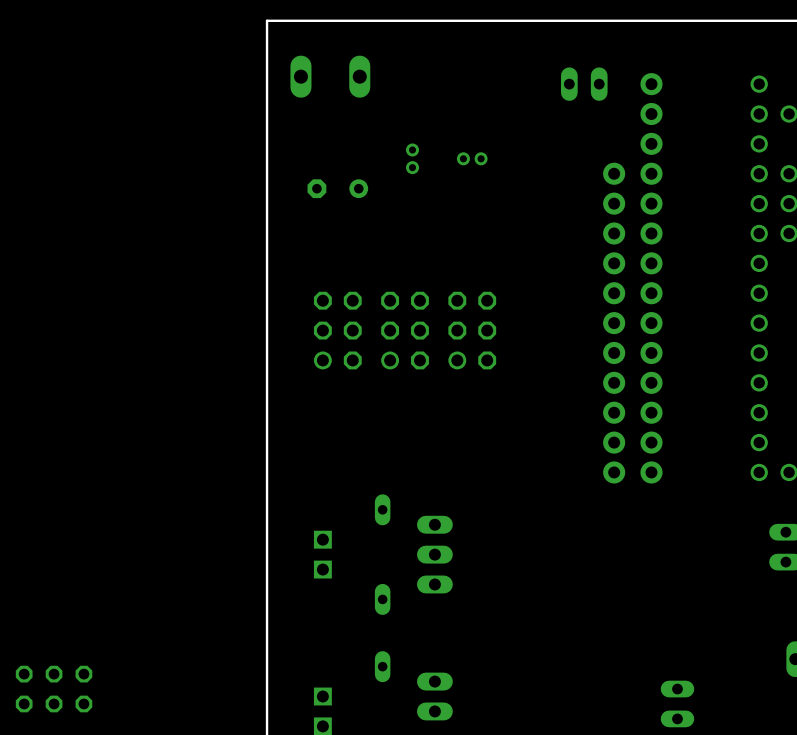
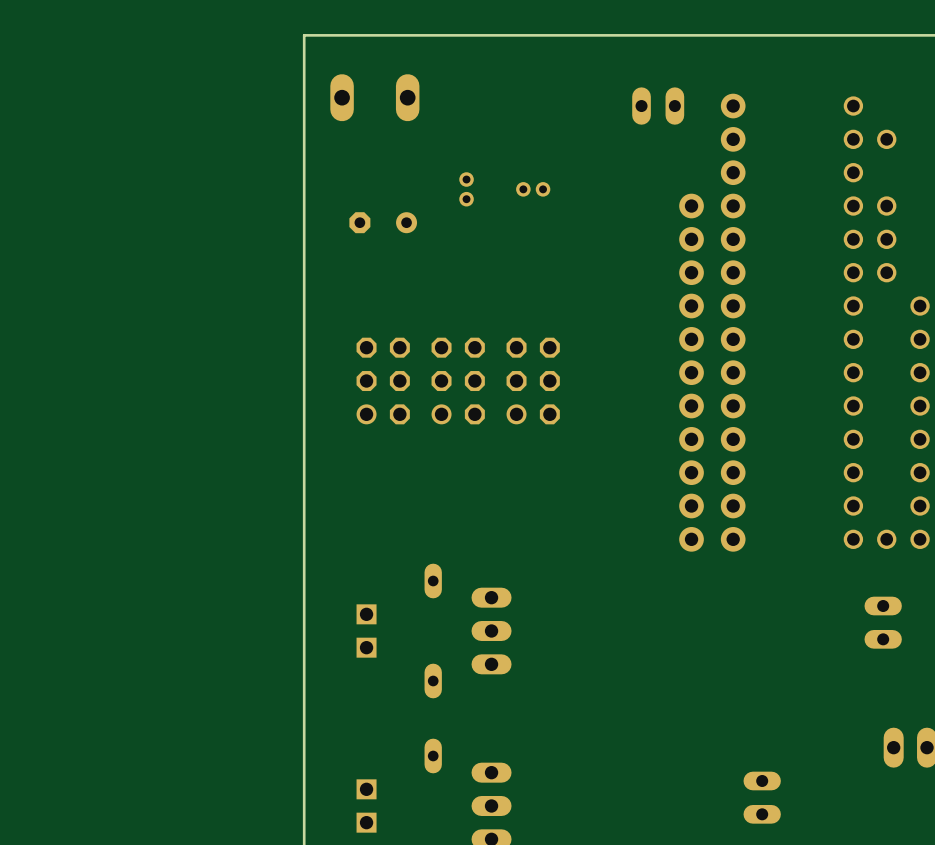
part: (54, 689) -> none

